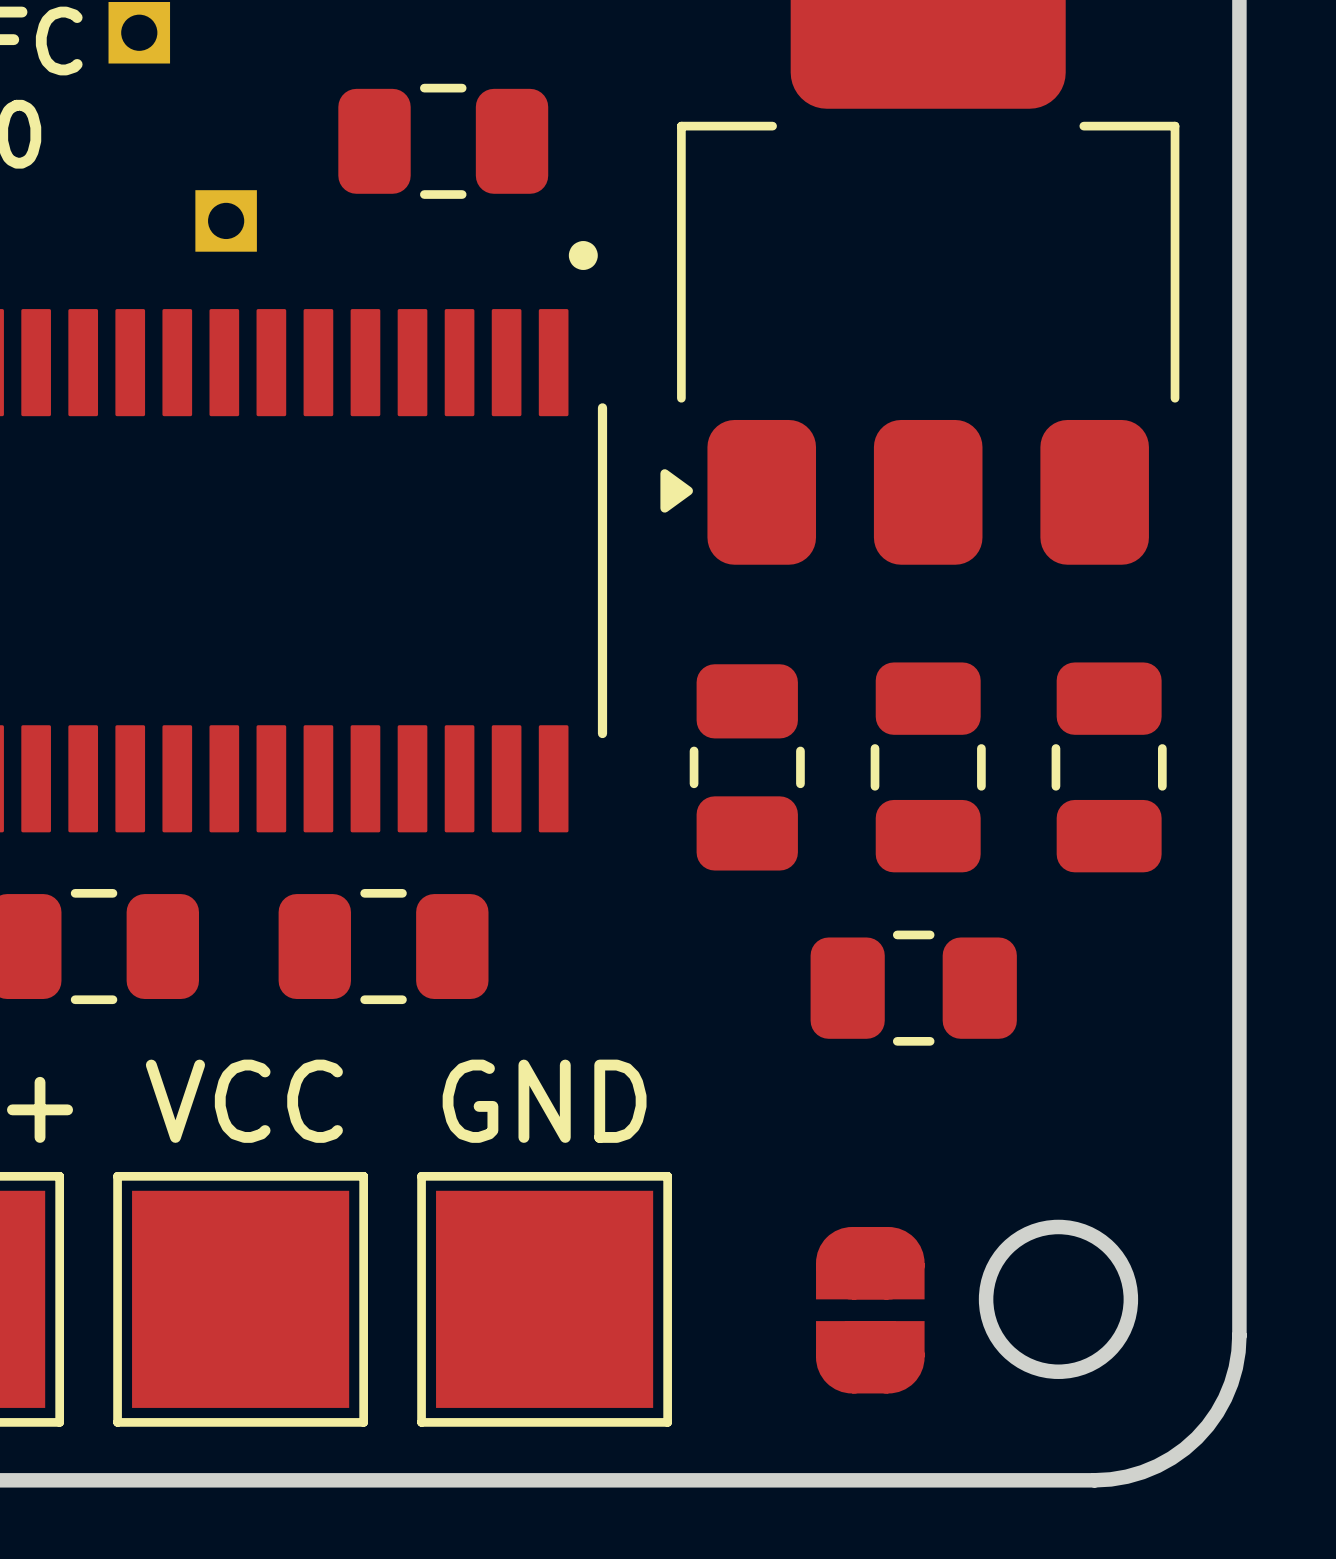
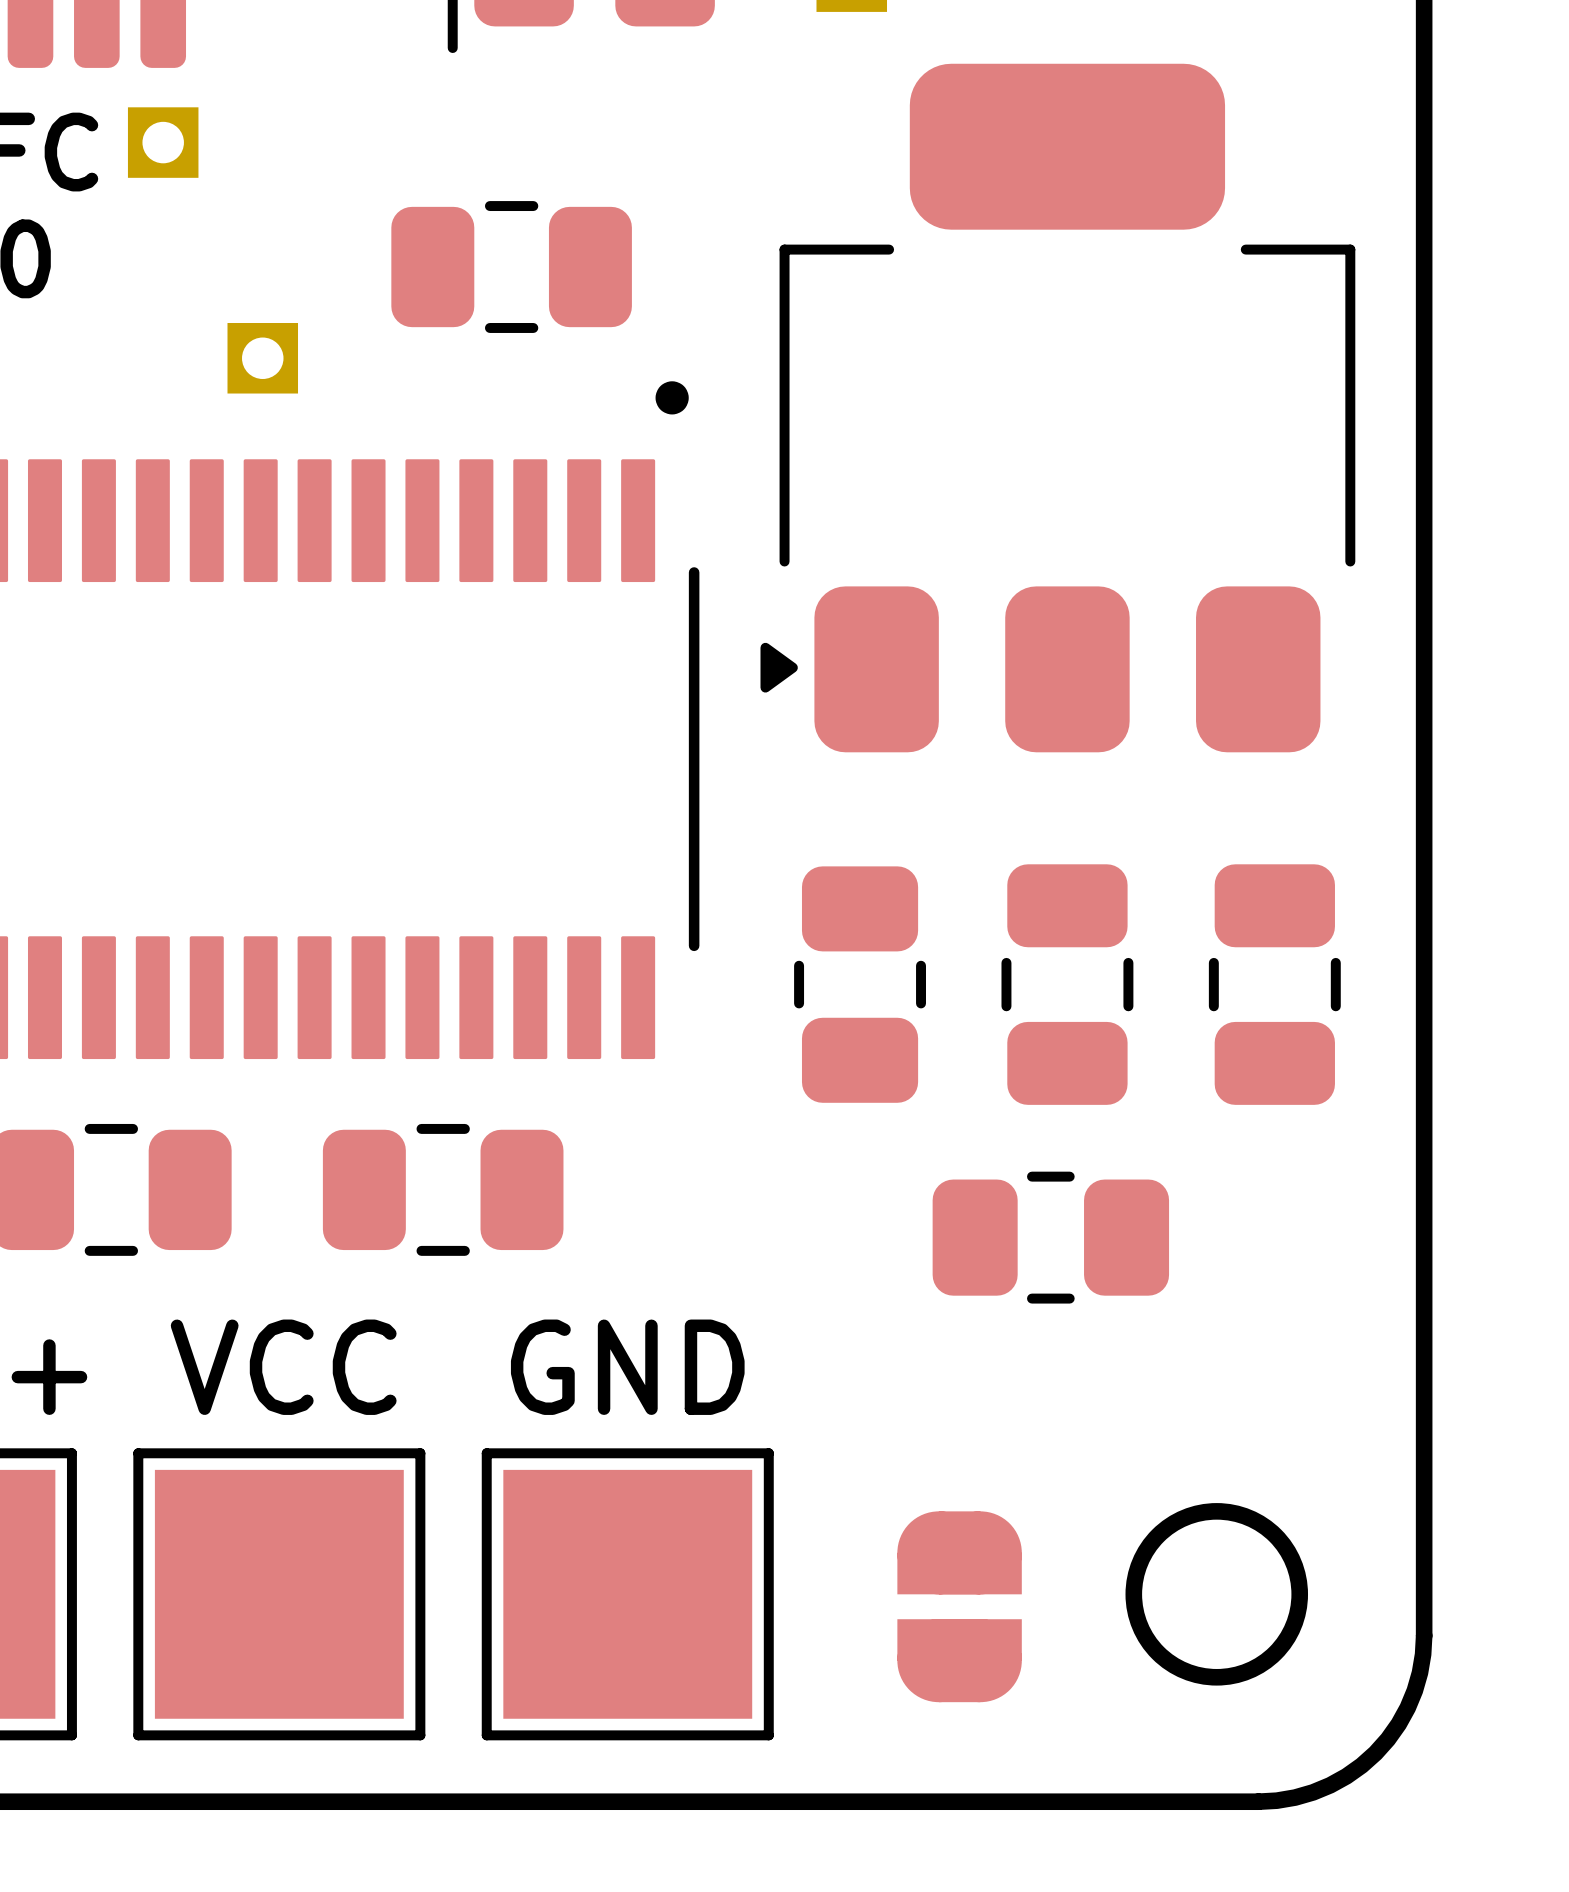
part position: (870, 1310) -> (959, 1606)

